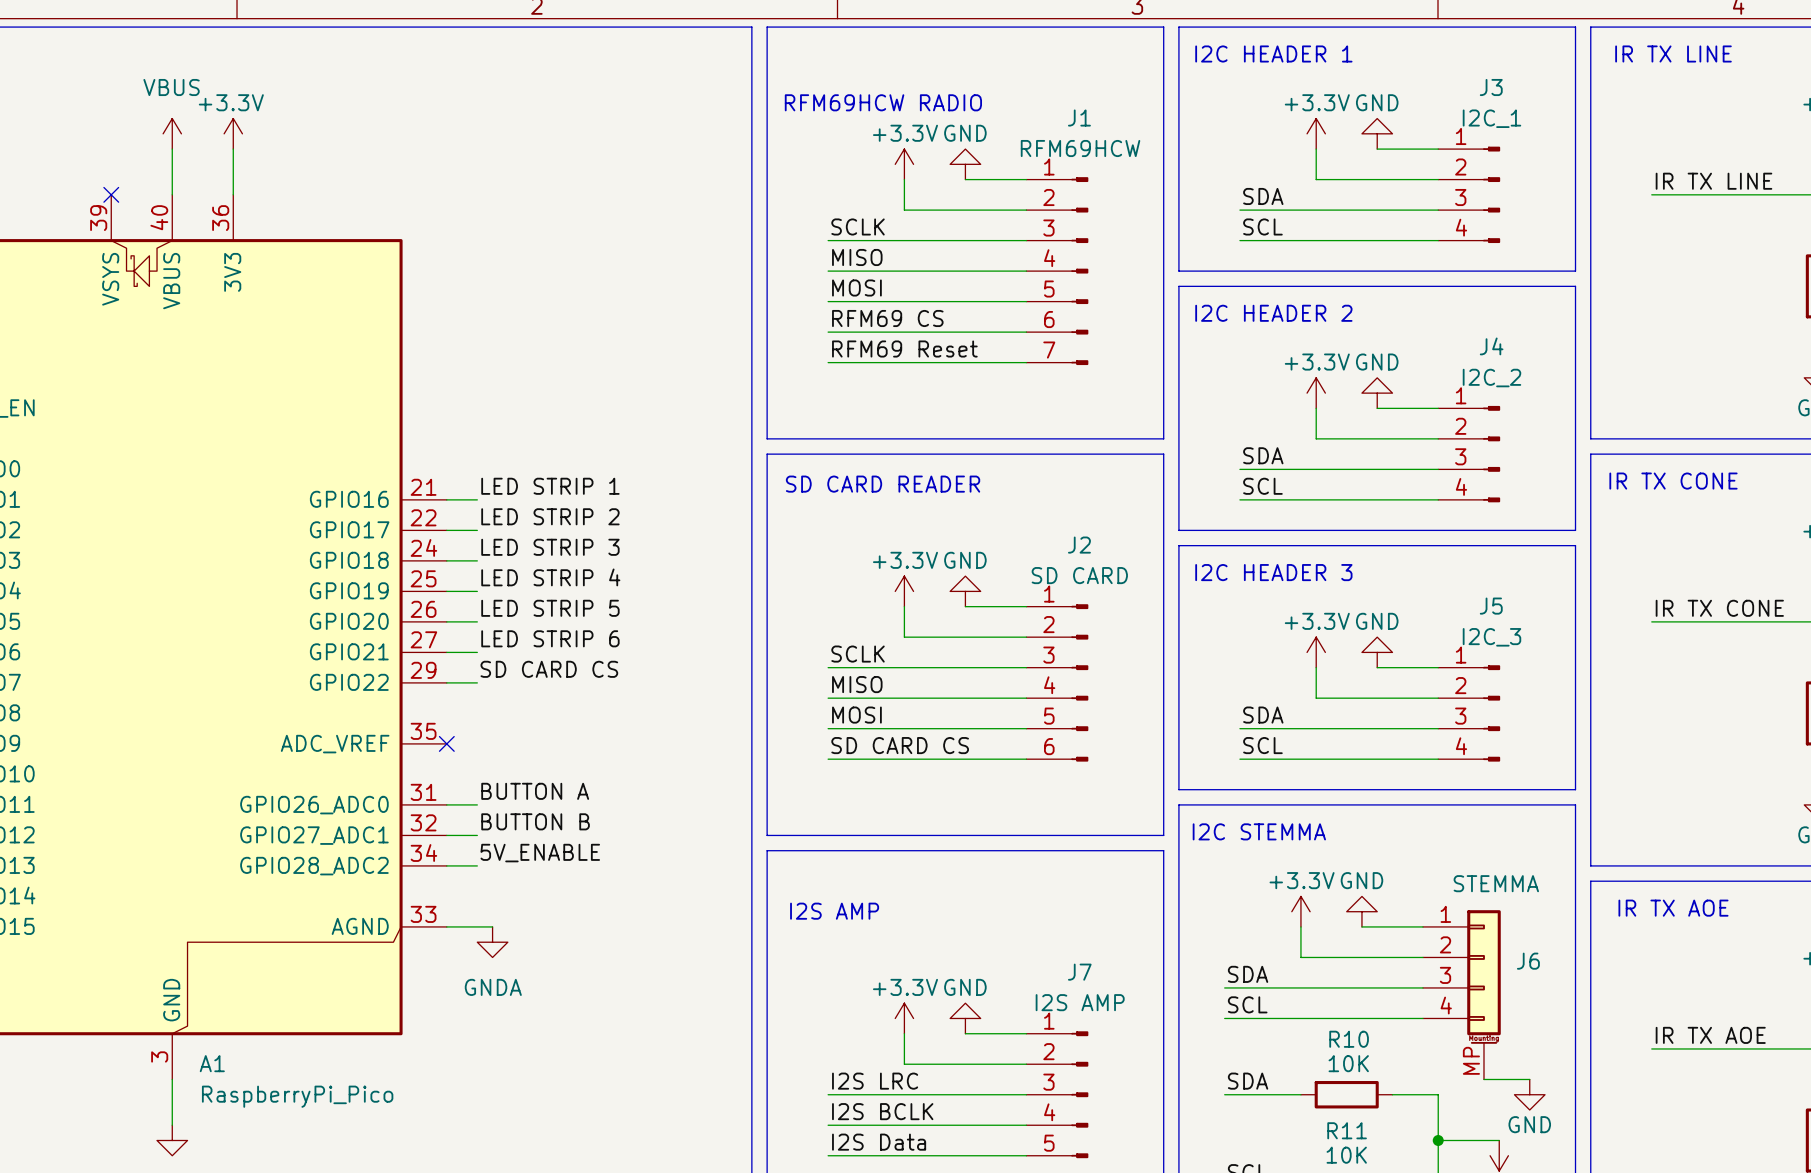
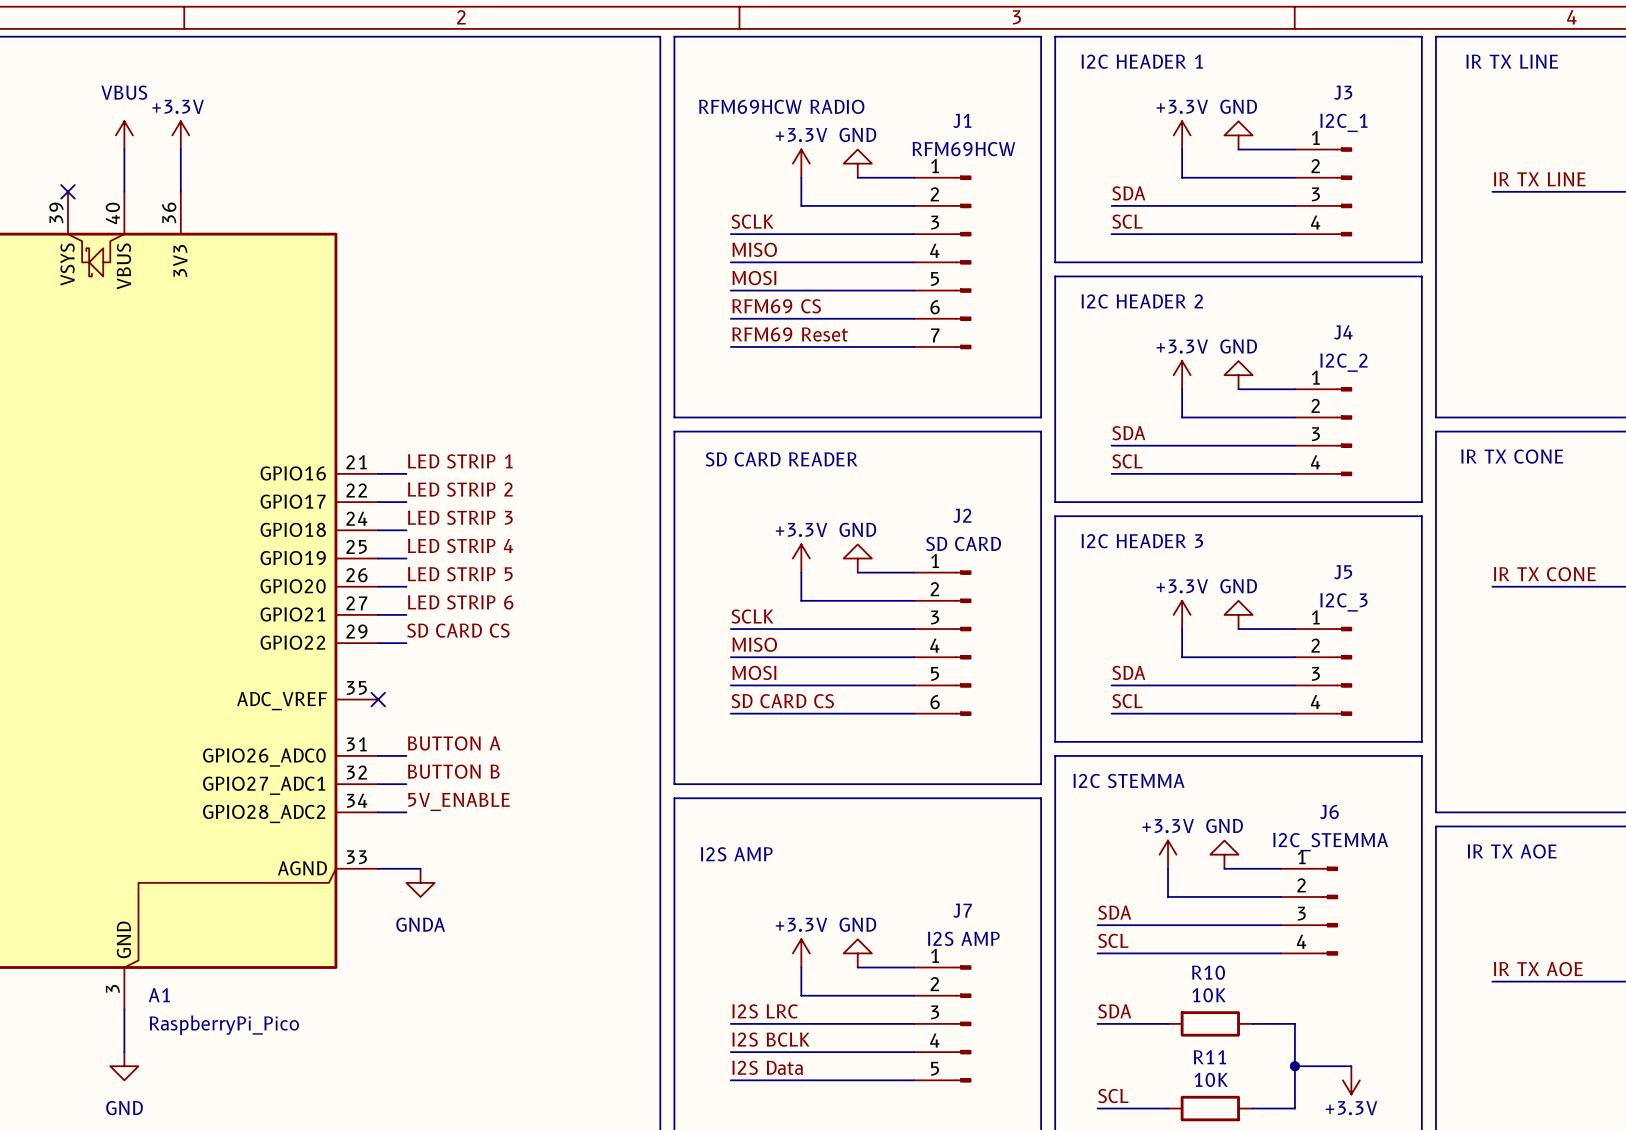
J6 value: STEMMA (1496, 883) -> I2C_STEMMA (1330, 842)
J6 symbol: [1422, 910, 1501, 1080] -> [1280, 866, 1339, 956]
J6 name position: J6 (1528, 961) -> J6 (1329, 811)
wire: (1483, 1079) (1529, 1079) -> none
power symbol: GND (1529, 1094) -> none

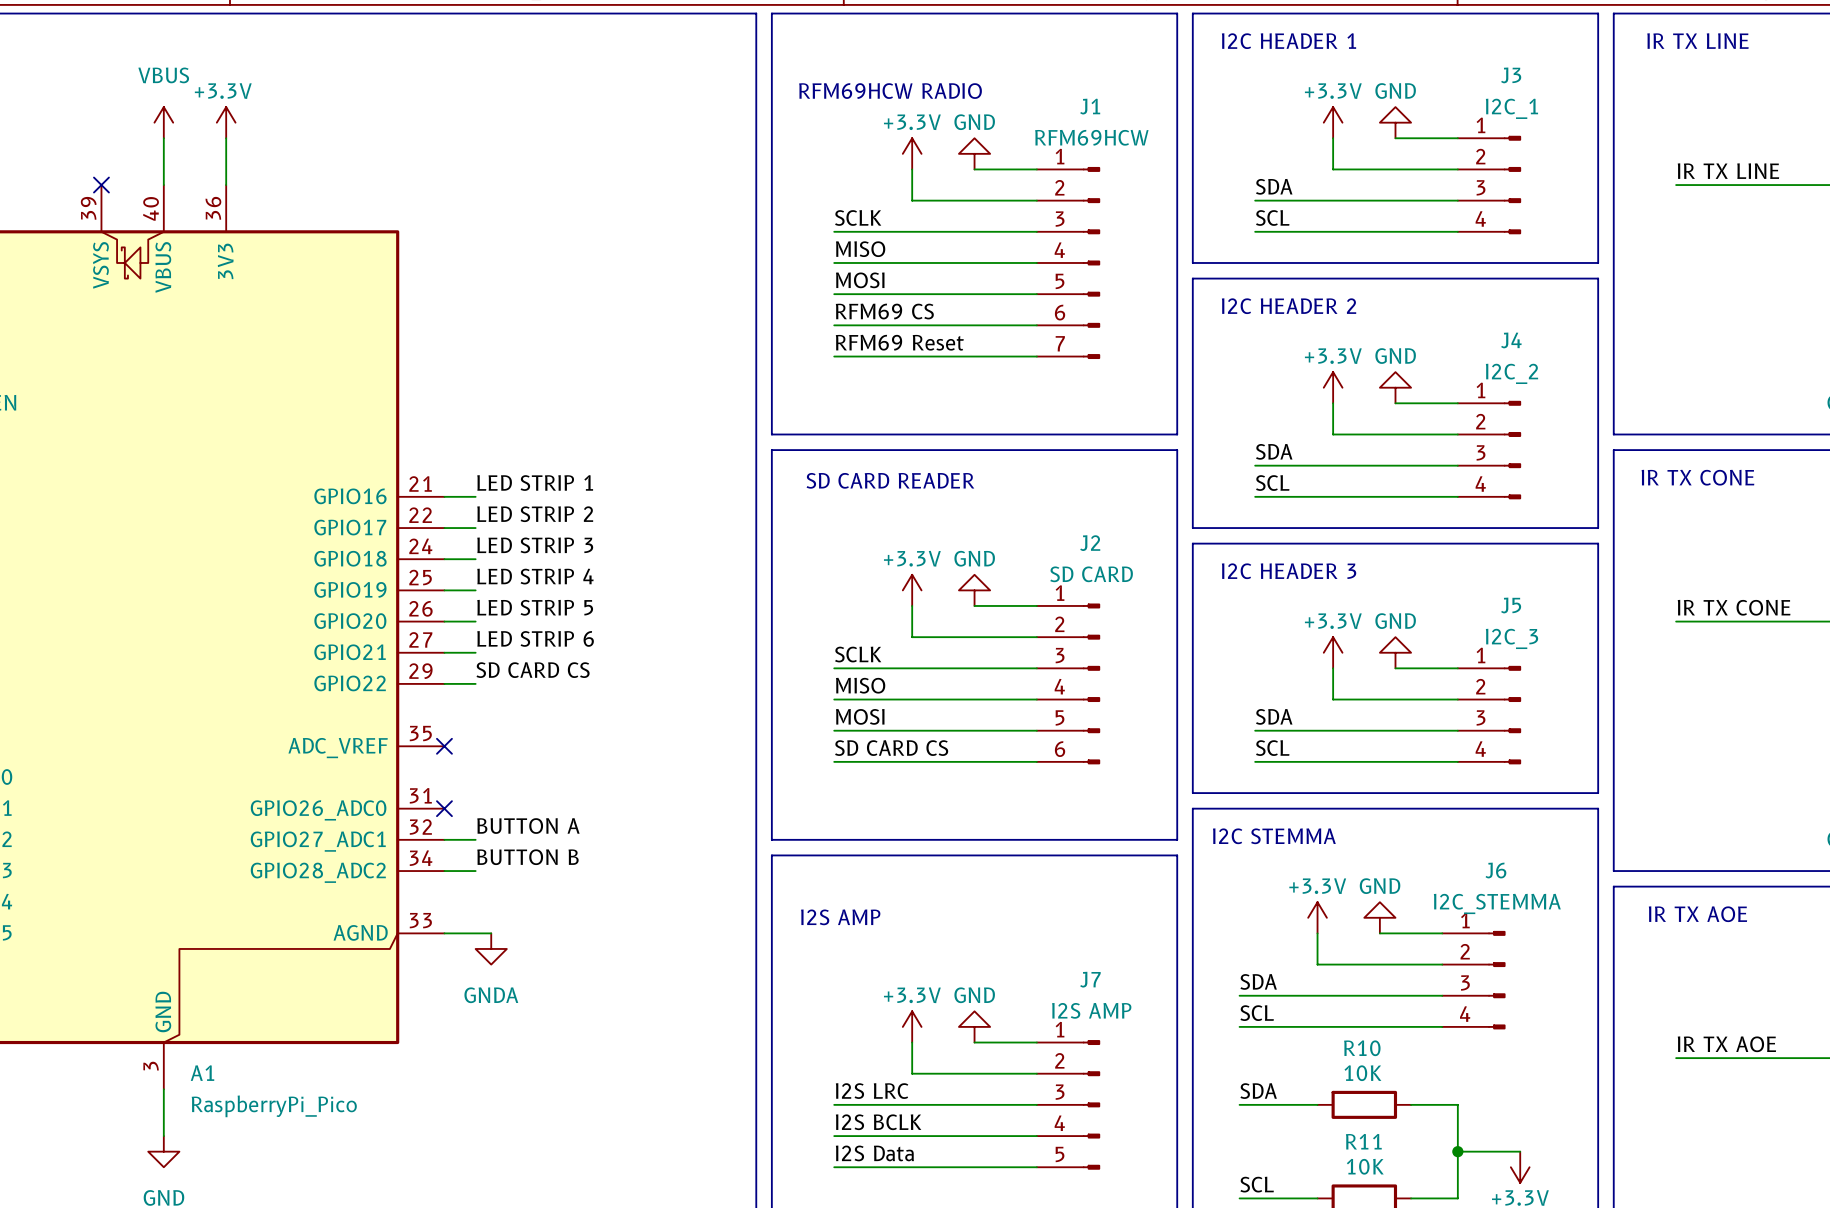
label: BUTTON A (454, 743) -> none
wire: (378, 755) (406, 755) -> none
no-connect mark: none -> (444, 808)
label: BUTTON B (453, 771) -> BUTTON A (528, 826)
label: 5V_ENABLE (459, 801) -> BUTTON B (527, 857)

